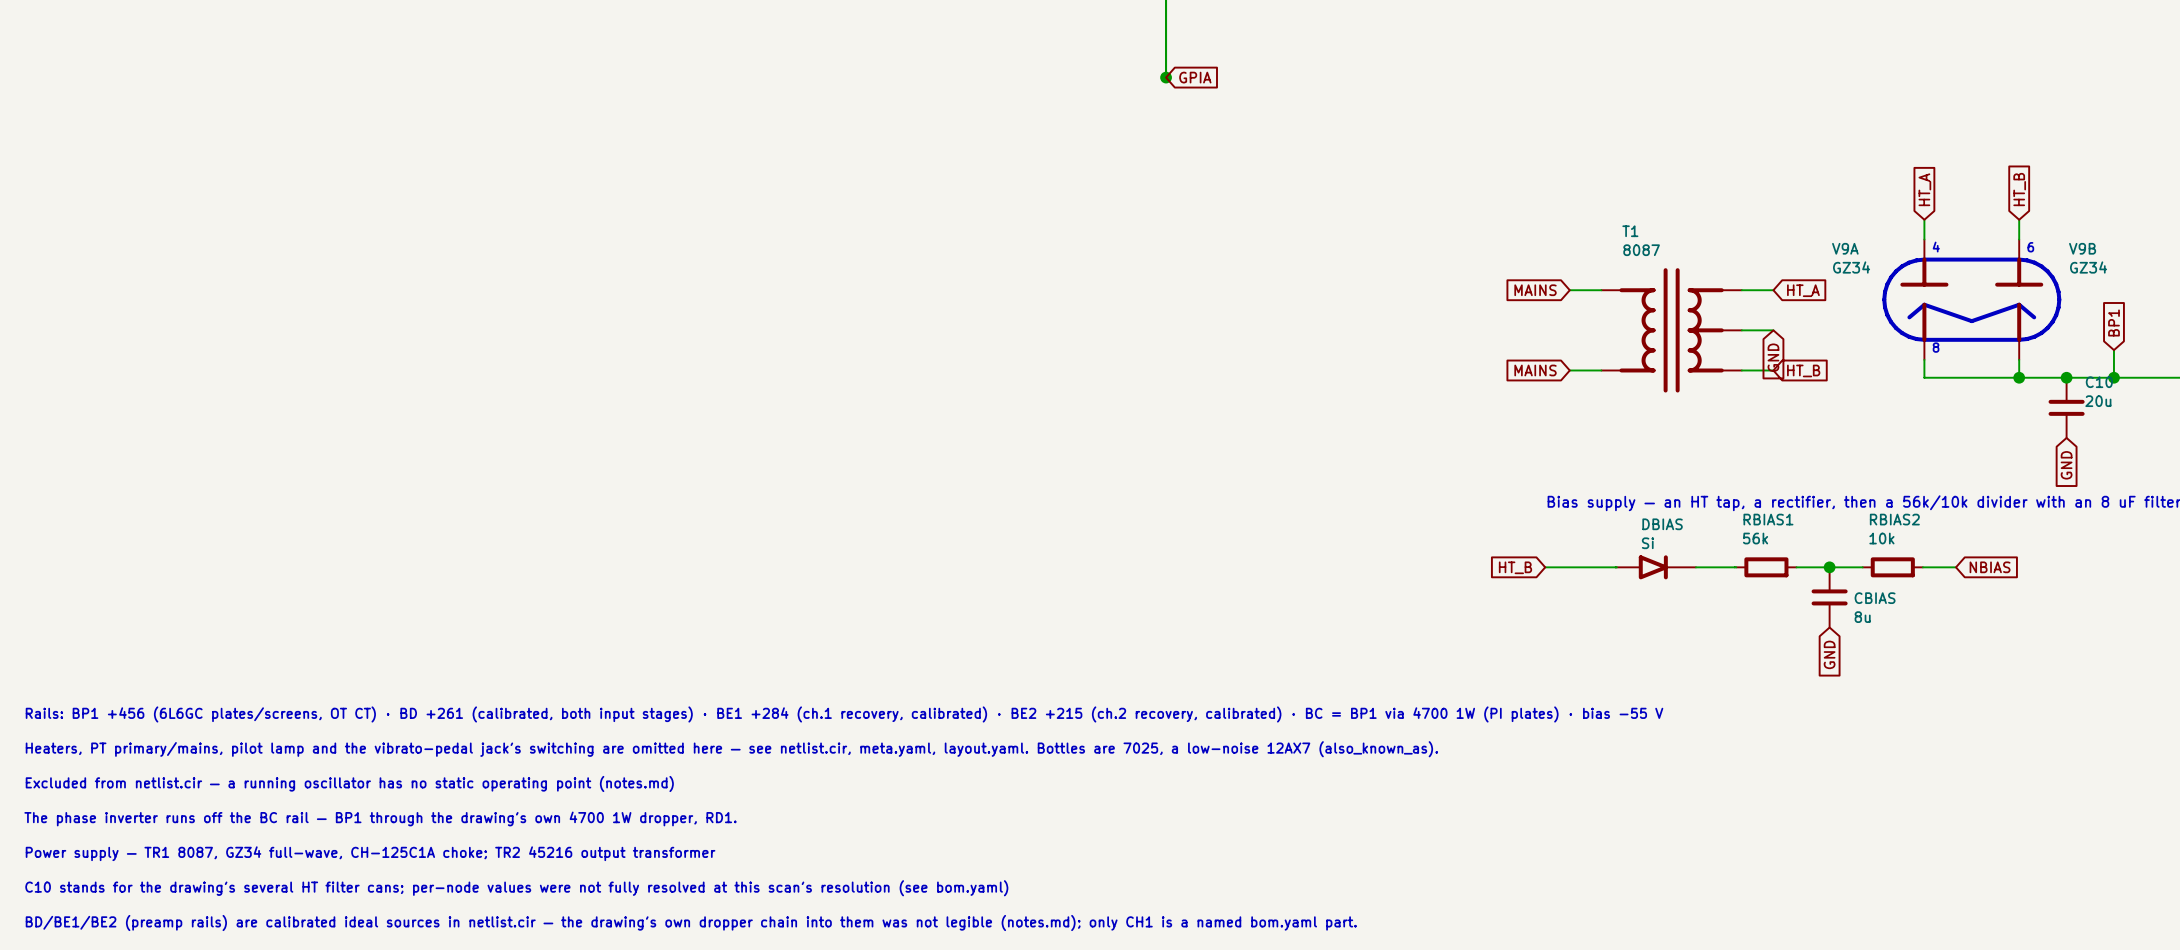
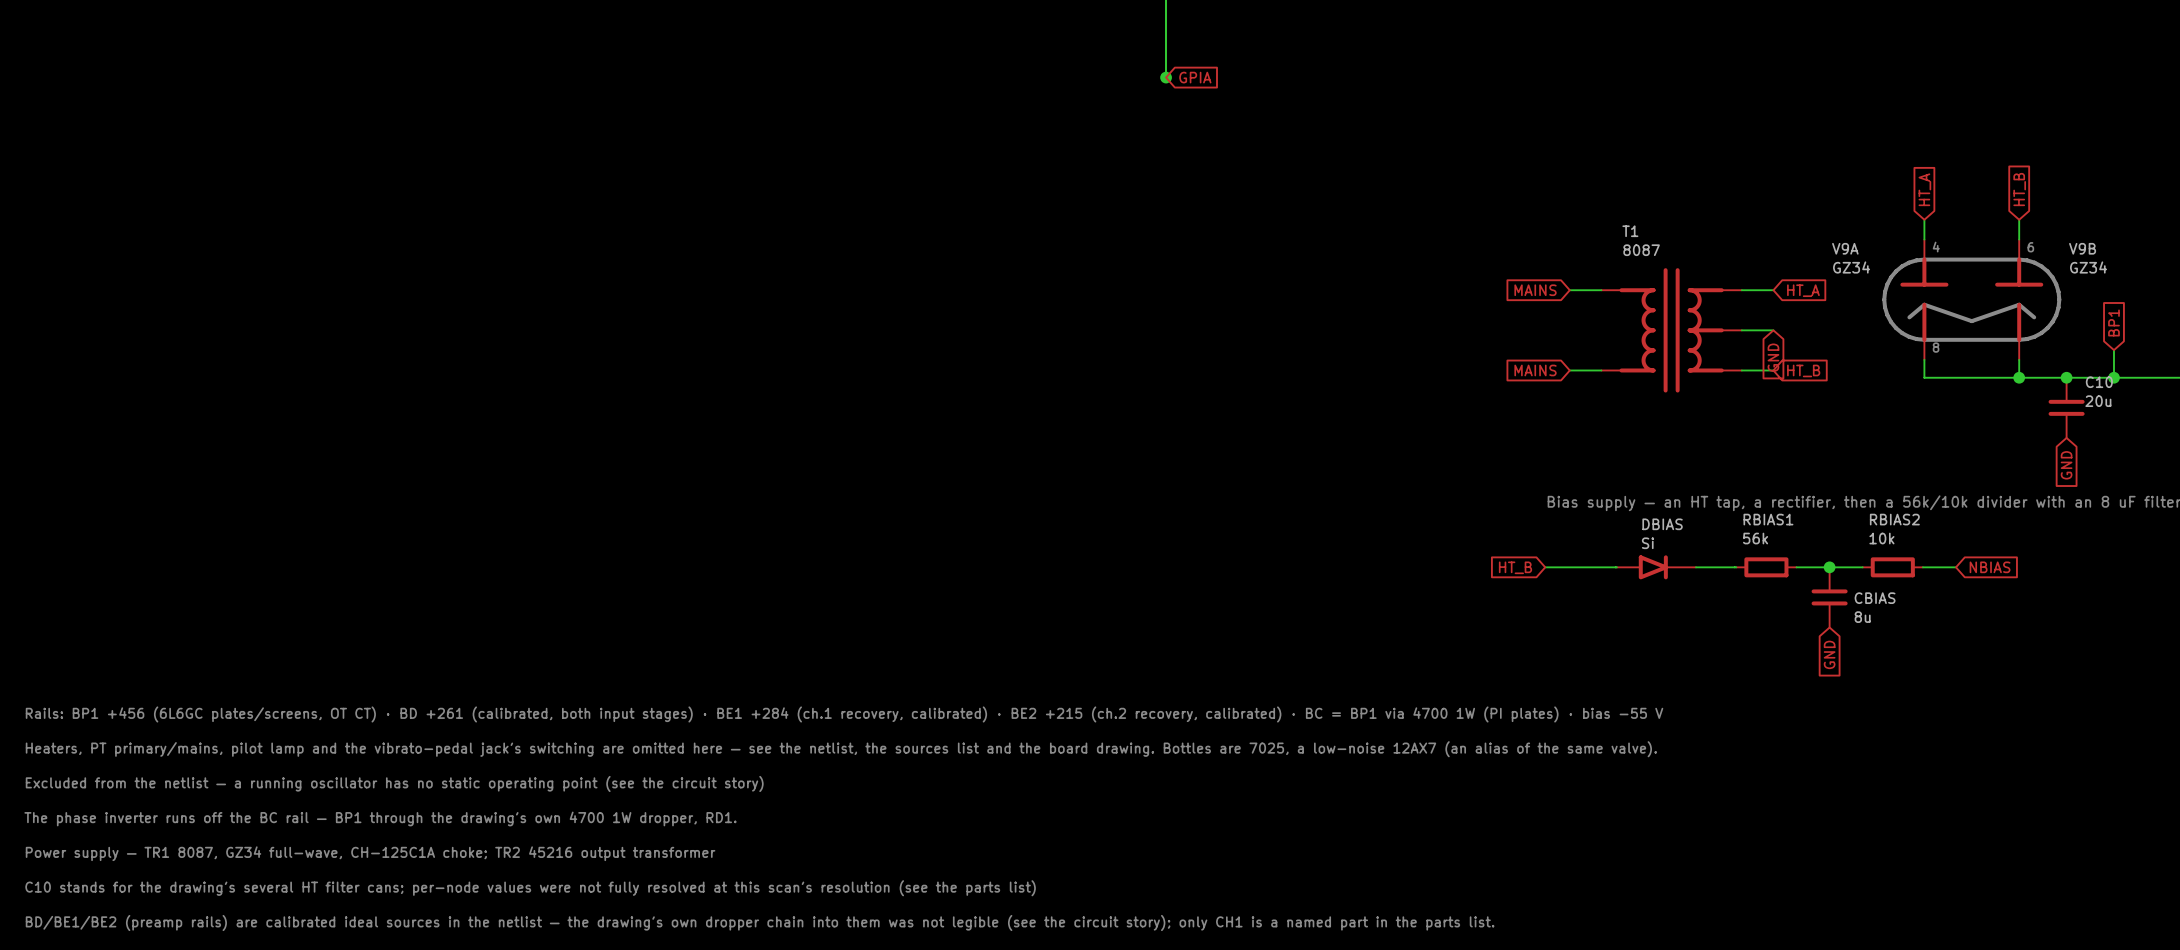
text: Heaters, PT primary/mains, pilot lamp and the vibrato-pedal jack's switching are omitted here — see netlist.cir, meta.yaml, layout.yaml. Bottles are 7025, a low-noise 12AX7 (also_known_as). (731, 749) -> Heaters, PT primary/mains, pilot lamp and the vibrato-pedal jack's switching are omitted here — see the netlist, the sources list and the board drawing. Bottles are 7025, a low-noise 12AX7 (an alias of the same valve). (841, 749)
text: Excluded from netlist.cir — a running oscillator has no static operating point (notes.md) (349, 783) -> Excluded from the netlist — a running oscillator has no static operating point (see the circuit story) (394, 783)
text: C10 stands for the drawing's several HT filter cans; per-node values were not fully resolved at this scan's resolution (see bom.yaml) (516, 888) -> C10 stands for the drawing's several HT filter cans; per-node values were not fully resolved at this scan's resolution (see the parts list) (530, 888)
text: BD/BE1/BE2 (preamp rails) are calibrated ideal sources in netlist.cir — the drawing's own dropper chain into them was not legible (notes.md); only CH1 is a named bom.yaml part. (691, 923) -> BD/BE1/BE2 (preamp rails) are calibrated ideal sources in the netlist — the drawing's own dropper chain into them was not legible (see the circuit story); only CH1 is a named part in the parts list. (760, 923)

